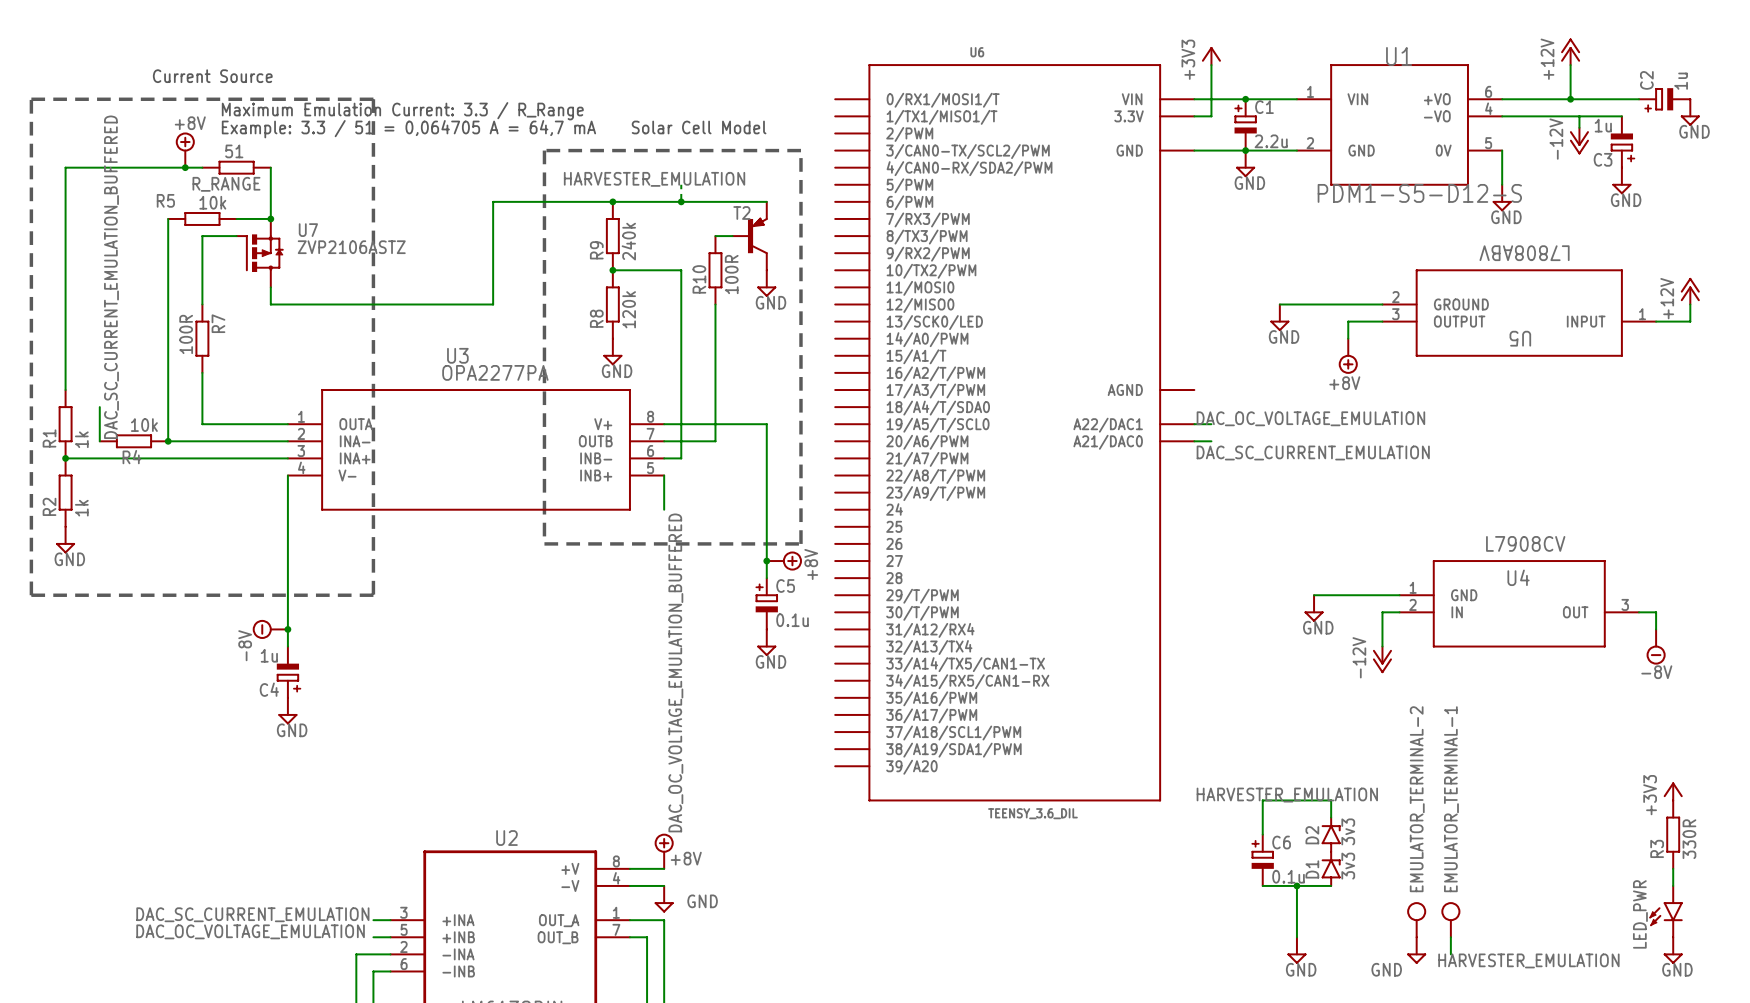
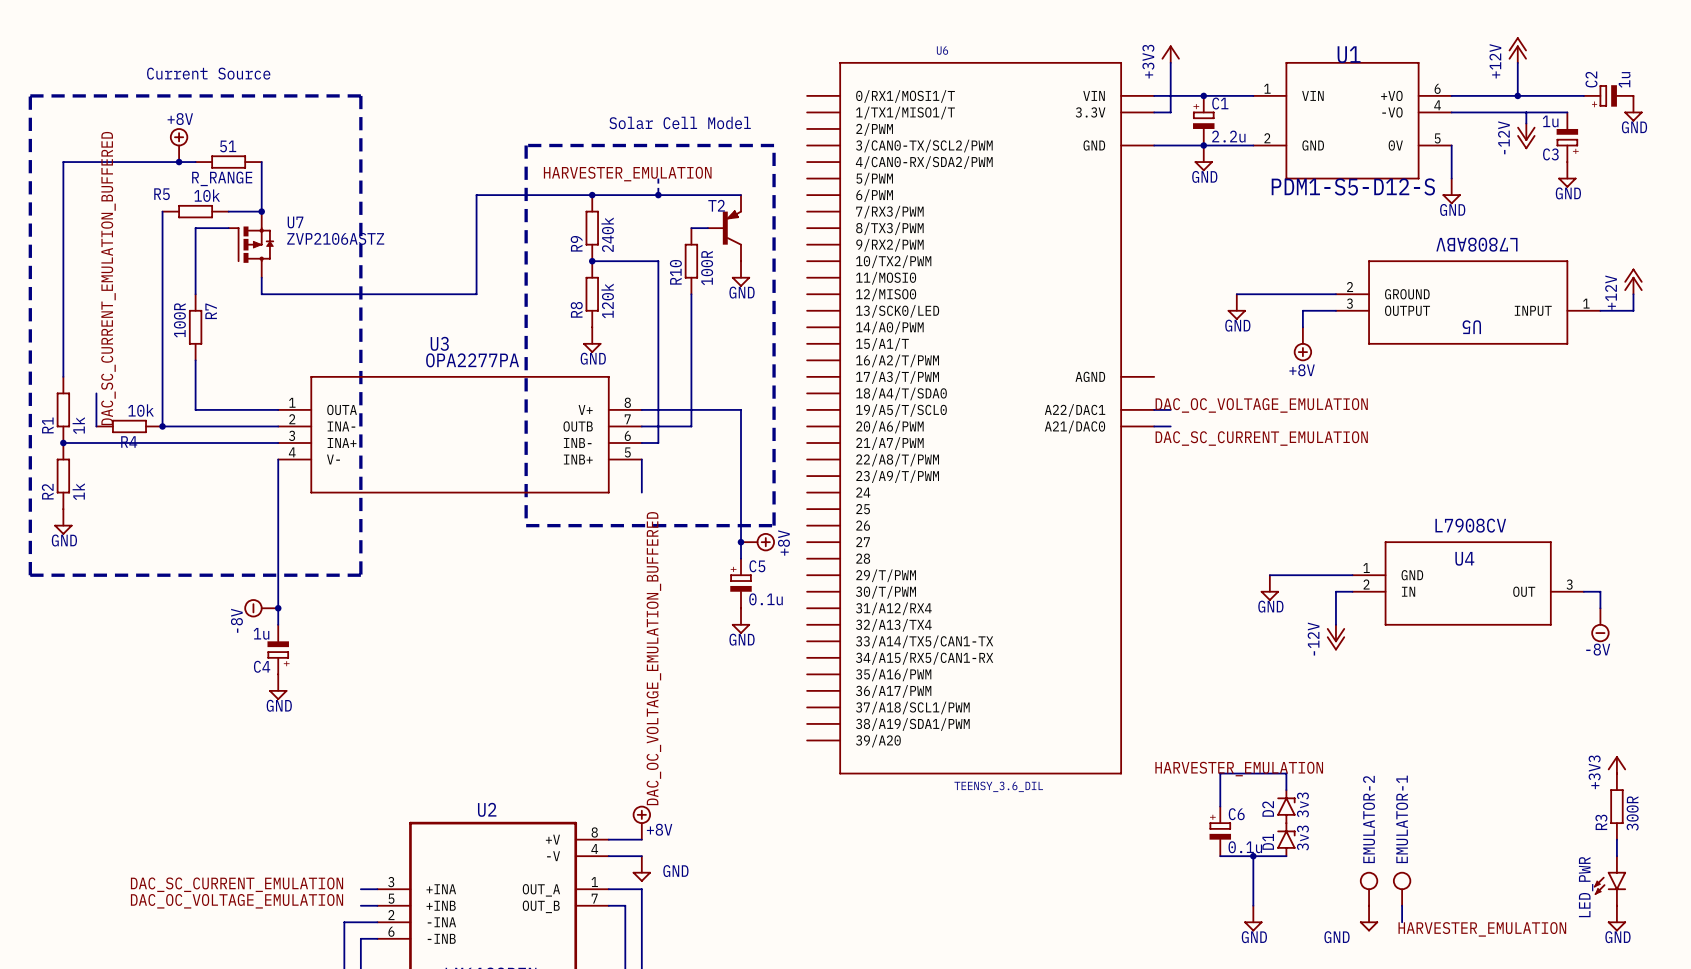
text: Maximum Emulation Current: 3.3 / R_Range (402, 111) -> none
text: Example: 3.3 / 51 = 0,064705 A = 64,7 mA (408, 129) -> none
EMULATOR_TERMINAL-2 name: EMULATOR_TERMINAL-2 (1417, 799) -> EMULATOR-2 (1369, 819)
EMULATOR_TERMINAL-1 name: EMULATOR_TERMINAL-1 (1451, 799) -> EMULATOR-1 (1402, 819)
R3 value: 330R (1689, 839) -> 300R (1632, 813)

